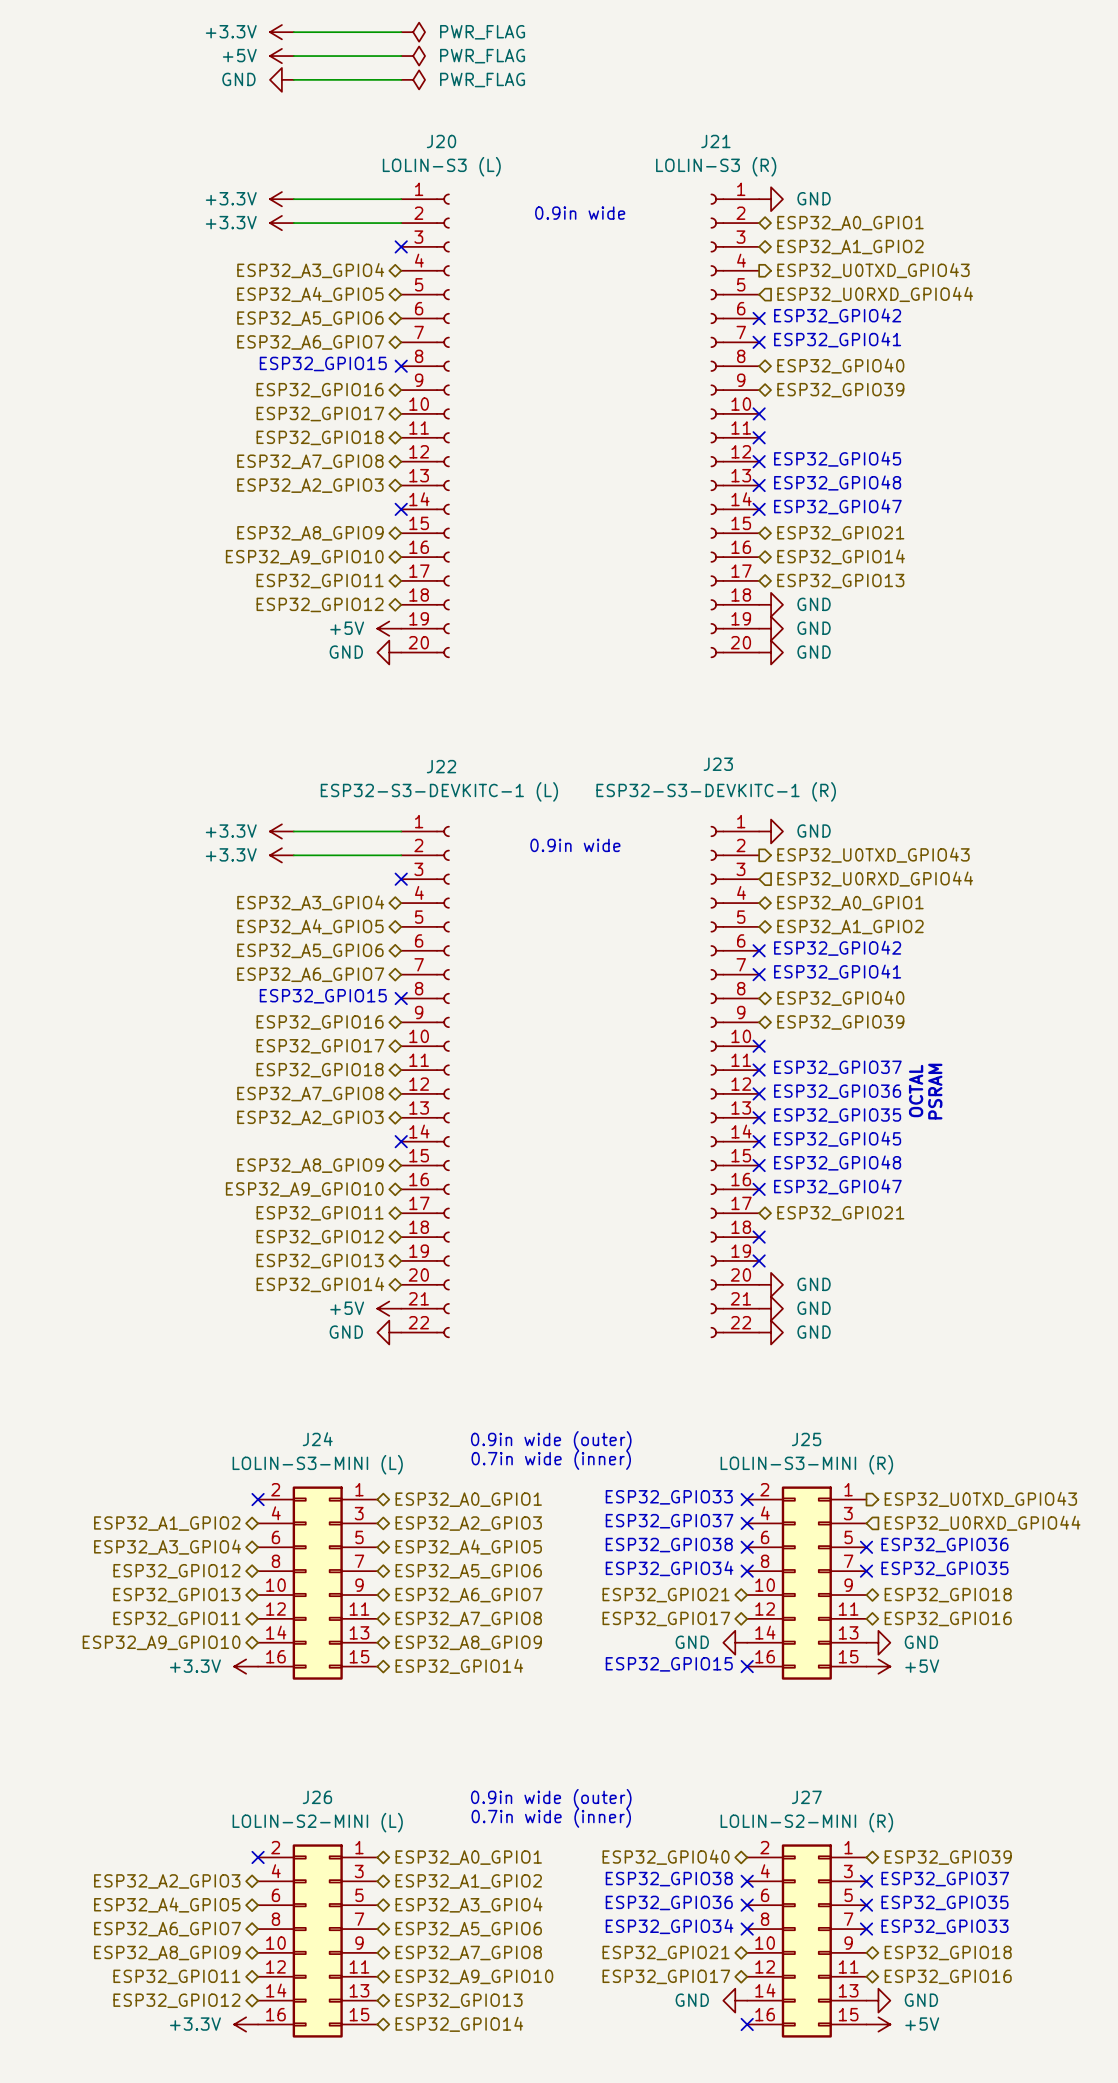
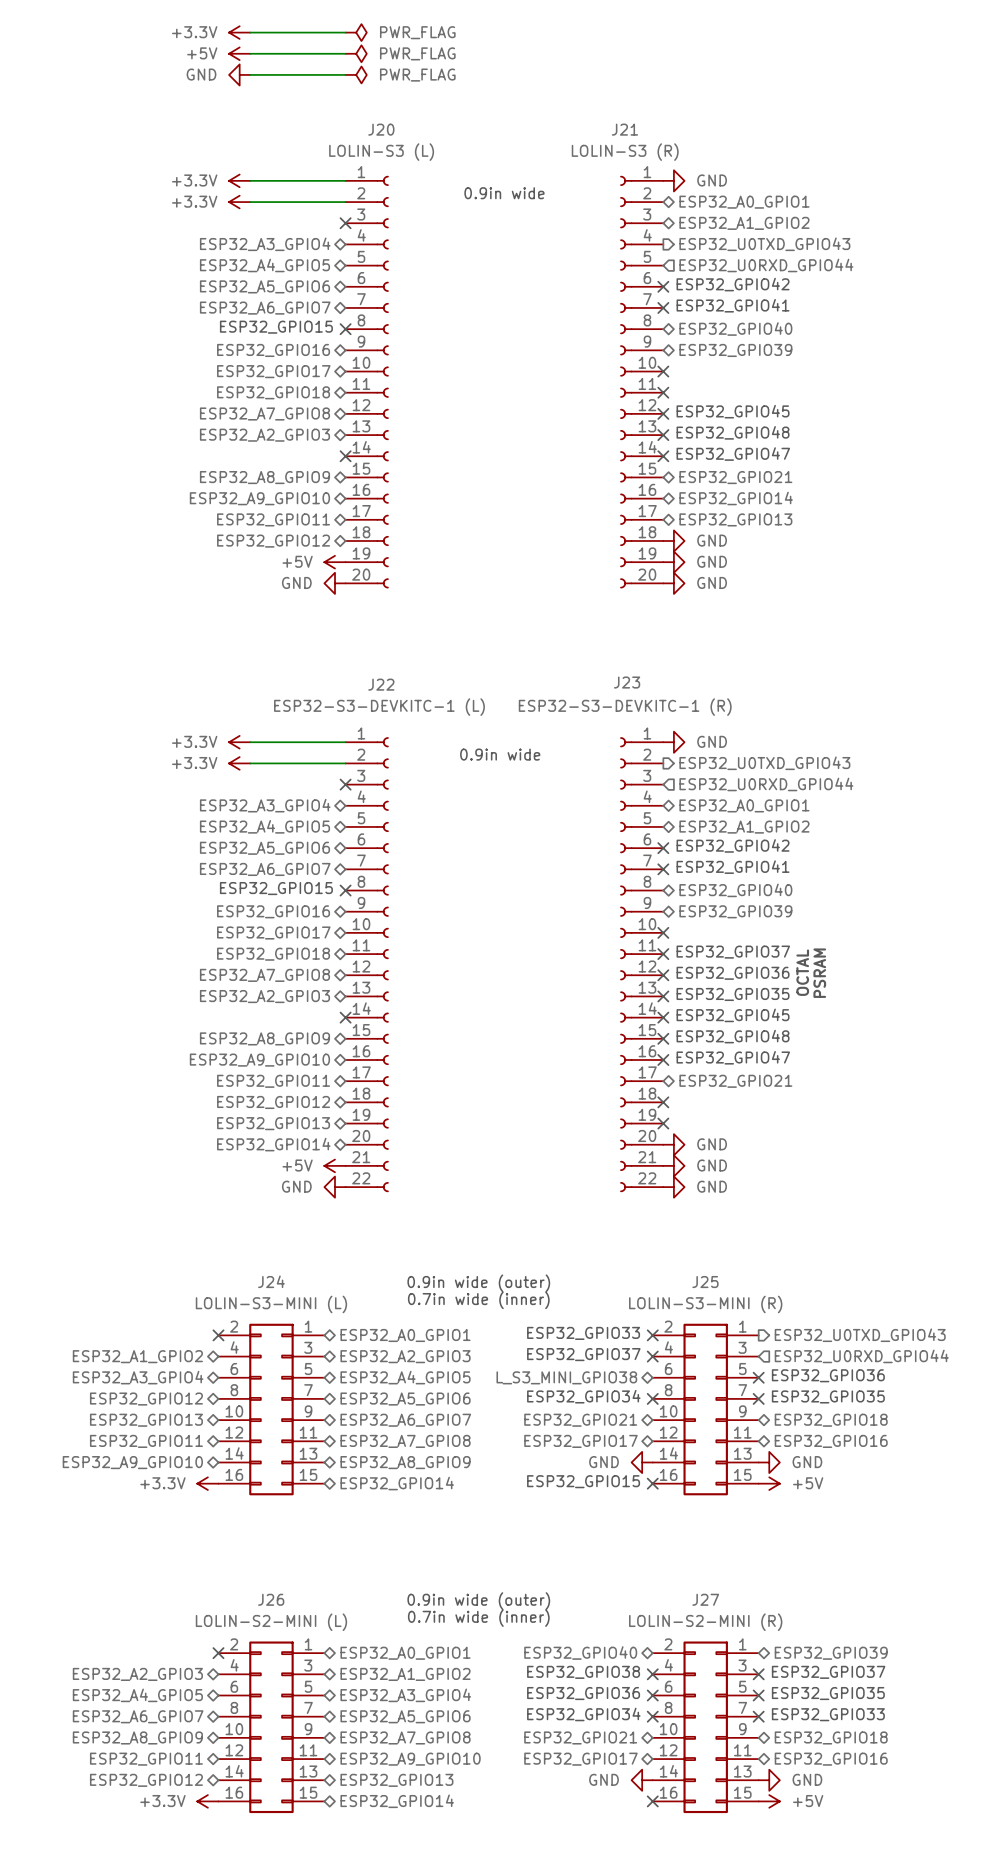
text: ESP32_GPIO38 (669, 1545) -> none
hierarchical label: none -> L_S3_MINI_GPIO38 (566, 1377)
no-connect mark: (747, 1547) -> none

